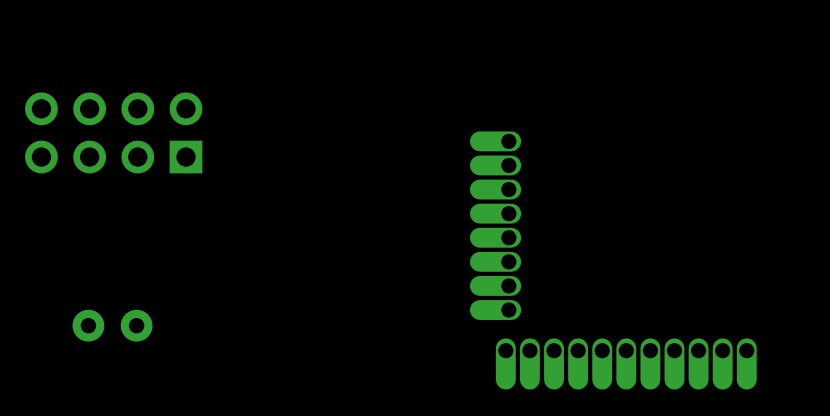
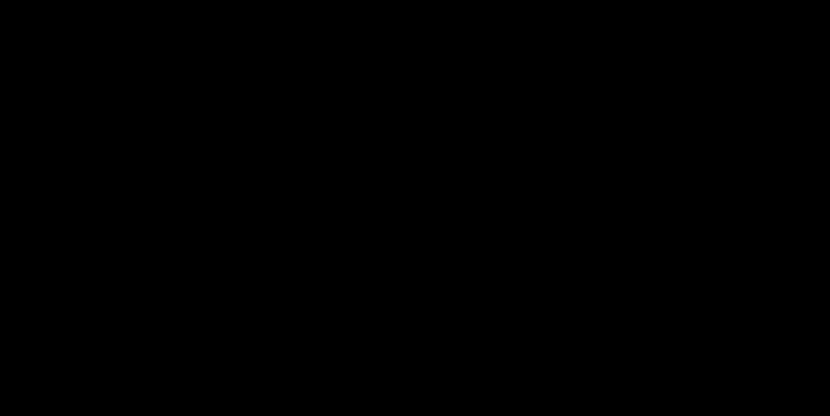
part: (113, 132) -> none
part: (613, 260) -> none
part: (112, 325) -> none

